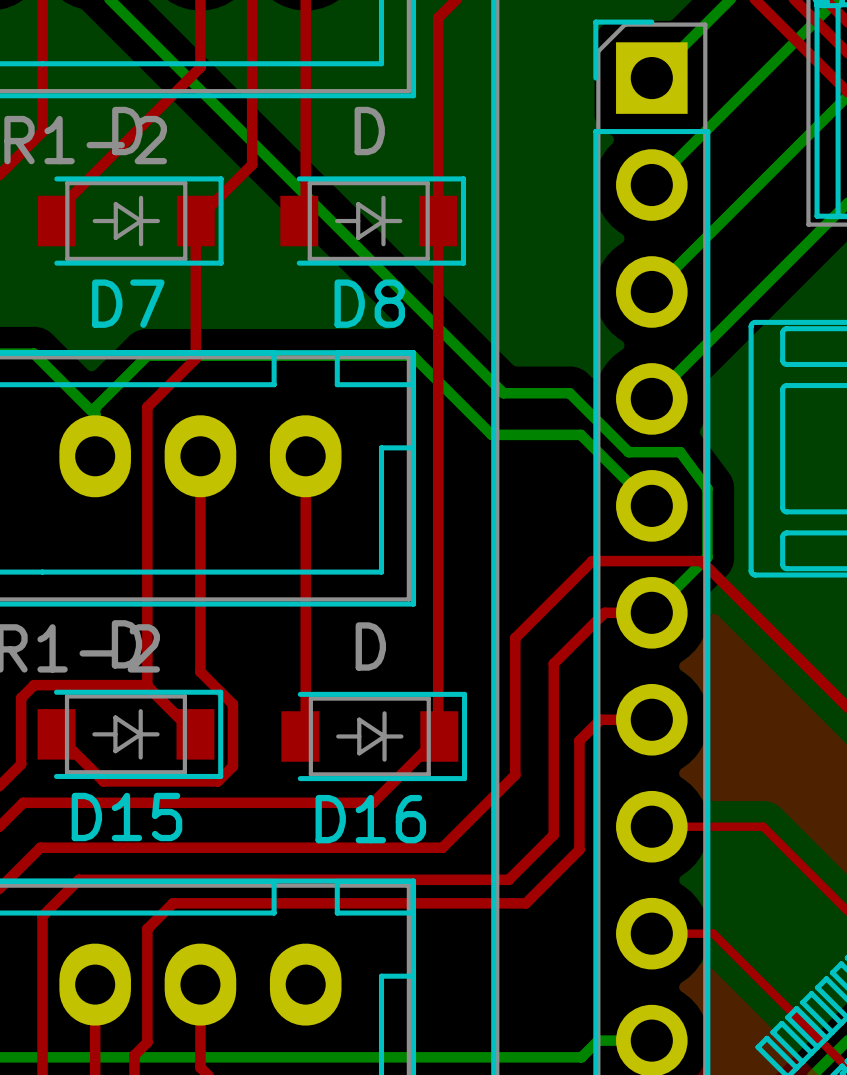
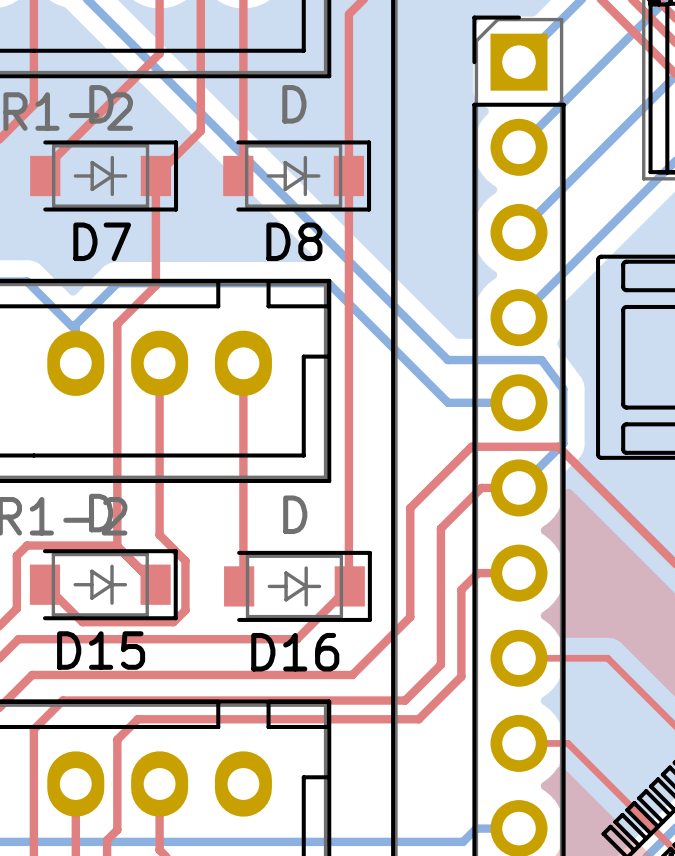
bottom track: (503, 393) (569, 393) (628, 452) -> (400, 313) (447, 360) (500, 360)
bottom track: (491, 434) (580, 434) (651, 505) -> (391, 346) (448, 402) (519, 402)

